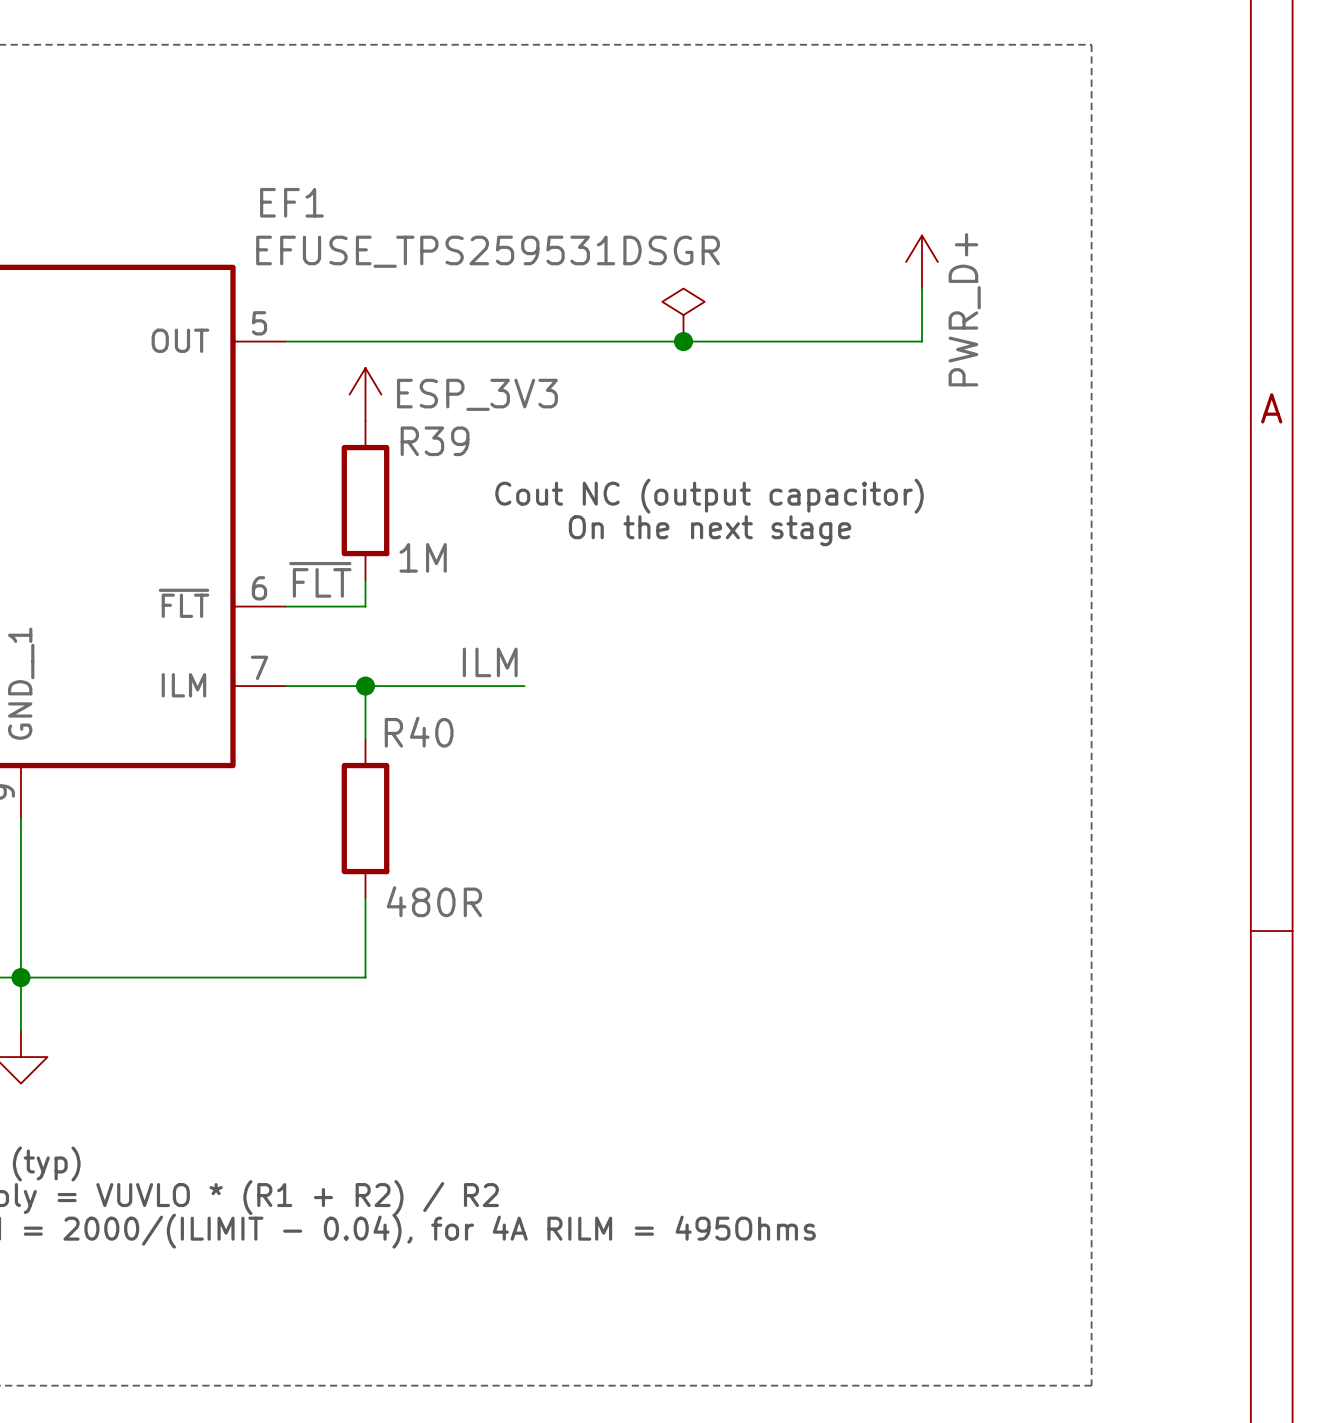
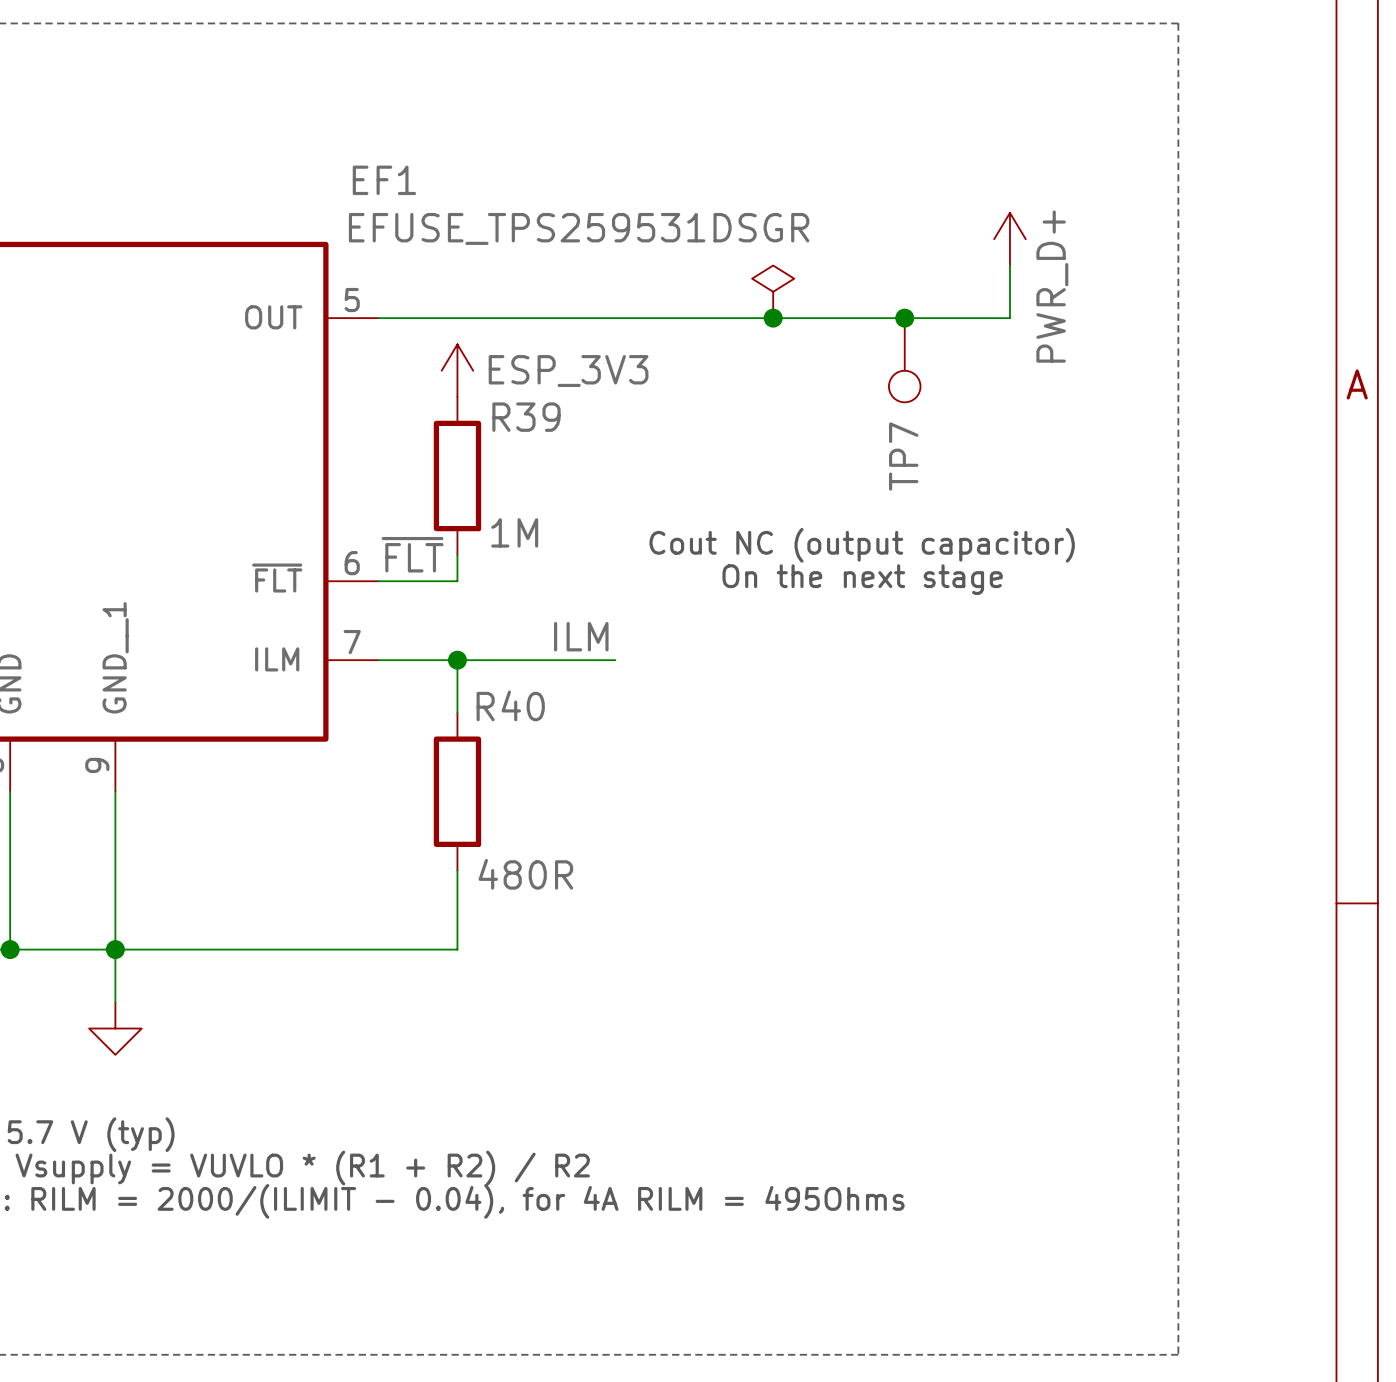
junction: none -> (904, 318)
TP7: none -> (904, 360)
text position: Cout NC (output capacitor) (709, 496) -> Cout NC (output capacitor) (862, 545)
text position: On the next stage (710, 530) -> On the next stage (862, 579)

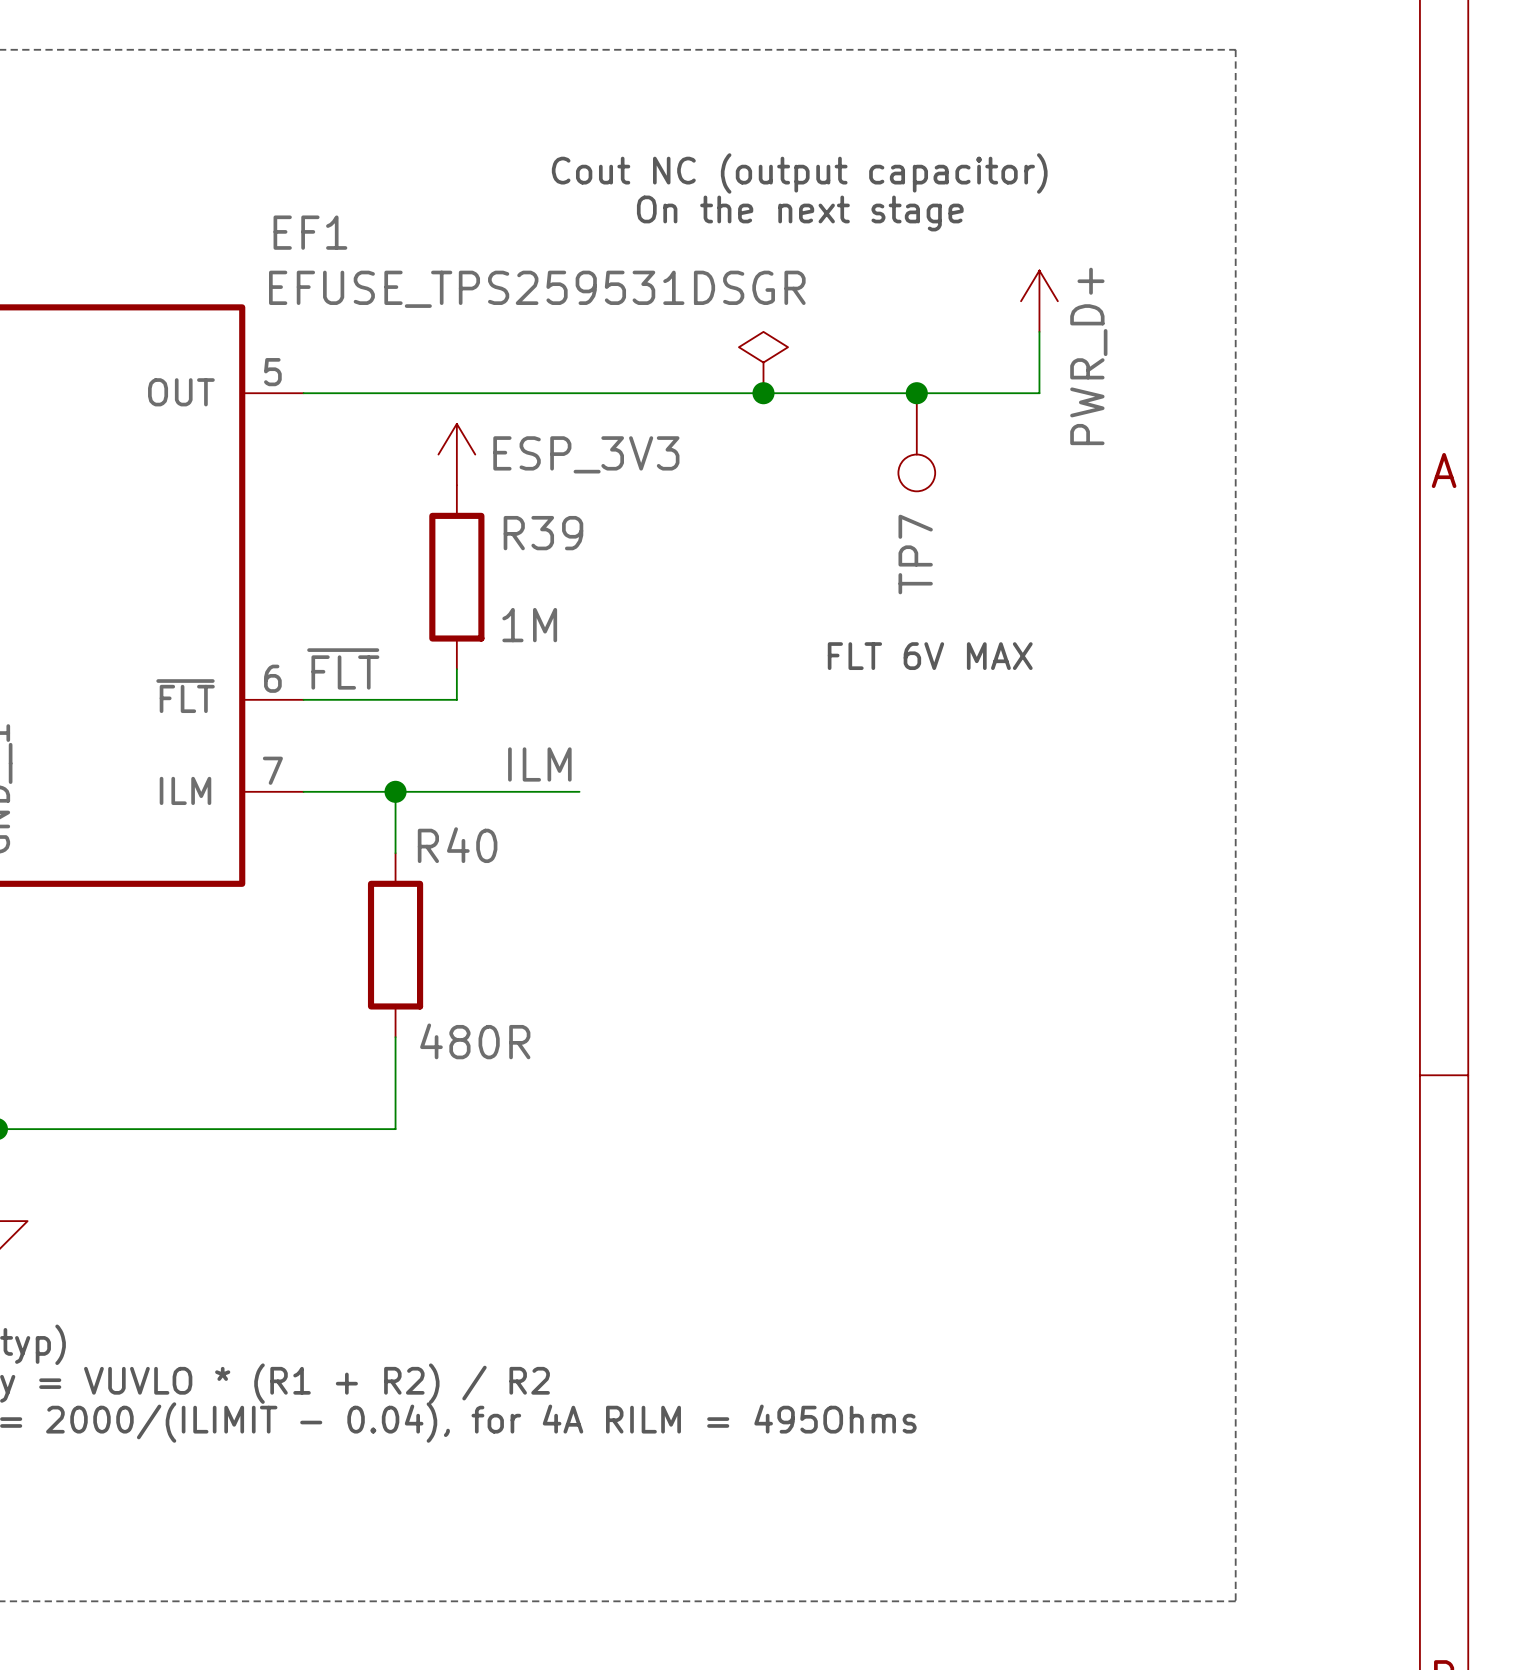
power symbol position: ESP_3V3 (457, 370) -> ESP_3V3 (456, 454)
R39 name position: R39 (526, 417) -> R39 (543, 533)
R39 position: (457, 475) -> (456, 577)
R39 value position: 1M (514, 532) -> 1M (529, 625)
text: none -> FLT 6V MAX (930, 656)
text position: Cout NC (output capacitor) (862, 545) -> Cout NC (output capacitor) (799, 173)
wire: (457, 554) (457, 581) -> (456, 669) (456, 699) (395, 699)
text position: On the next stage (862, 579) -> On the next stage (800, 213)

